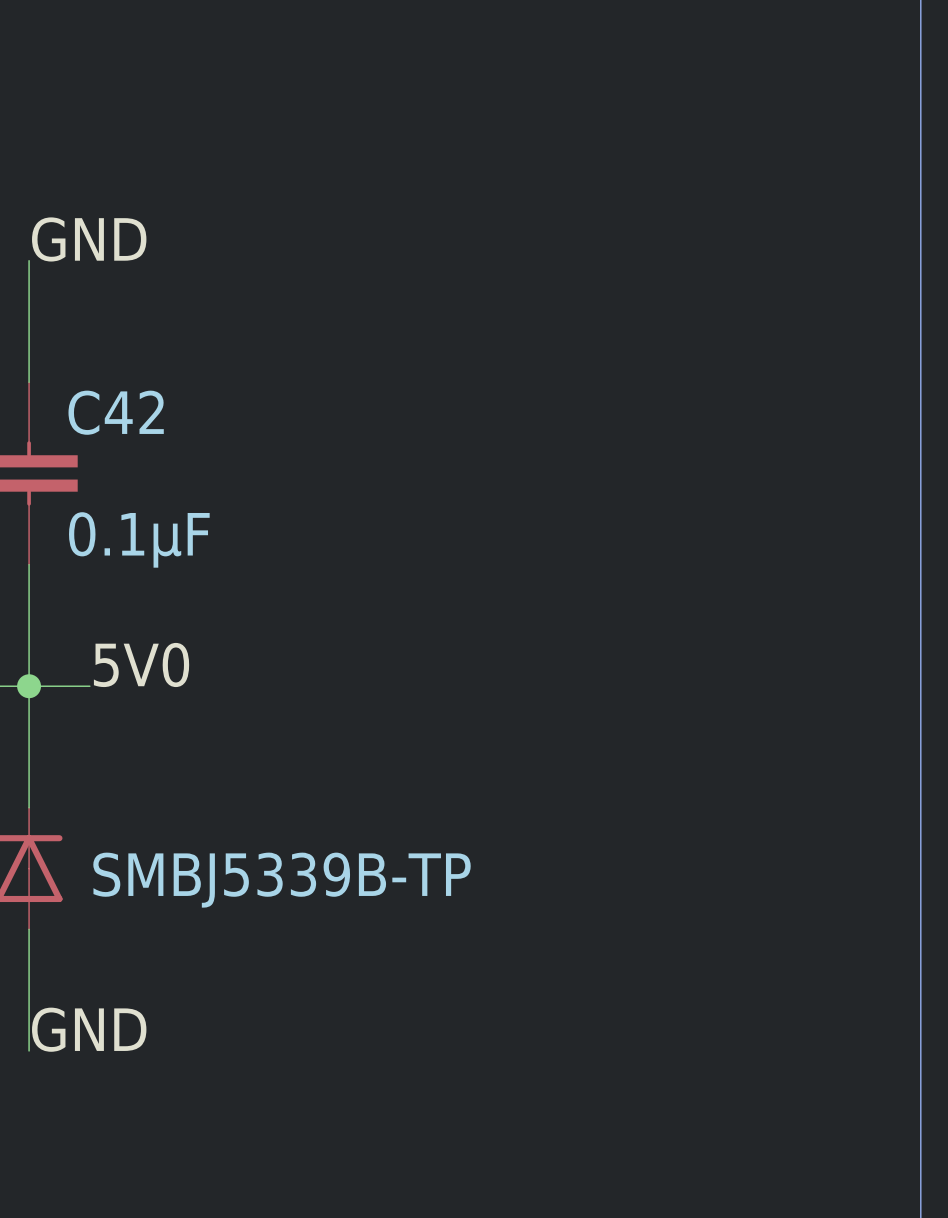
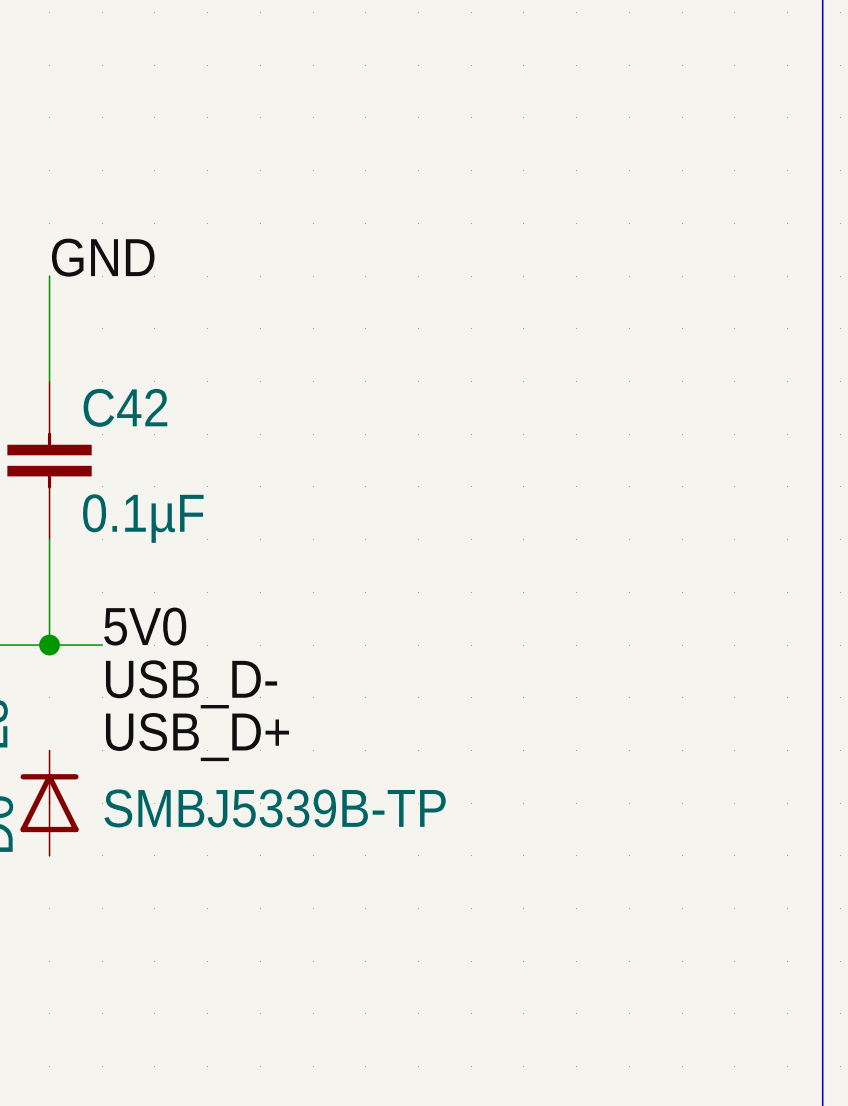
wire: (29, 686) (29, 807) -> none
label: none -> USB_D- (191, 684)
label: none -> USB_D+ (197, 737)
wire: (29, 929) (29, 1050) -> none
label: GND (89, 1029) -> none

